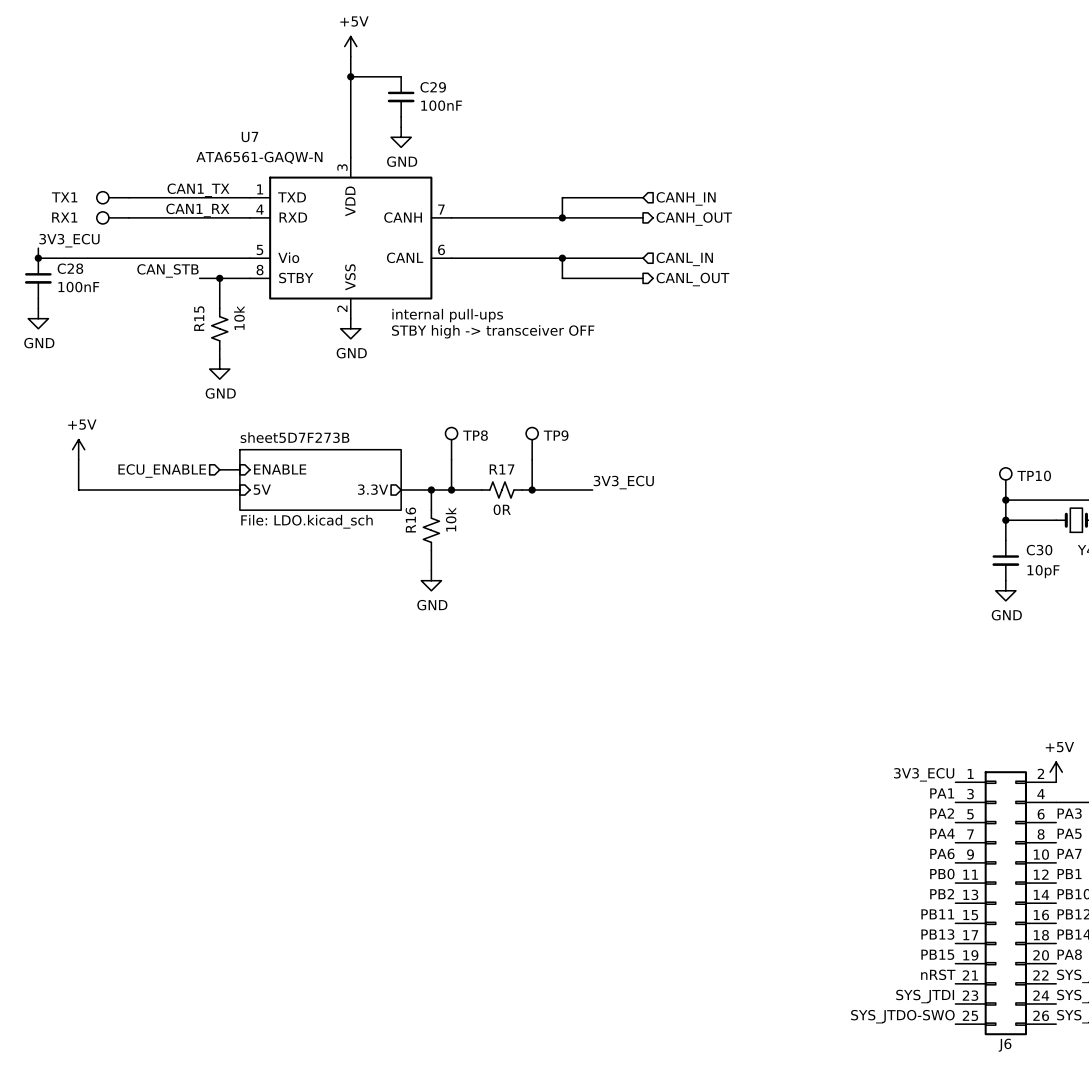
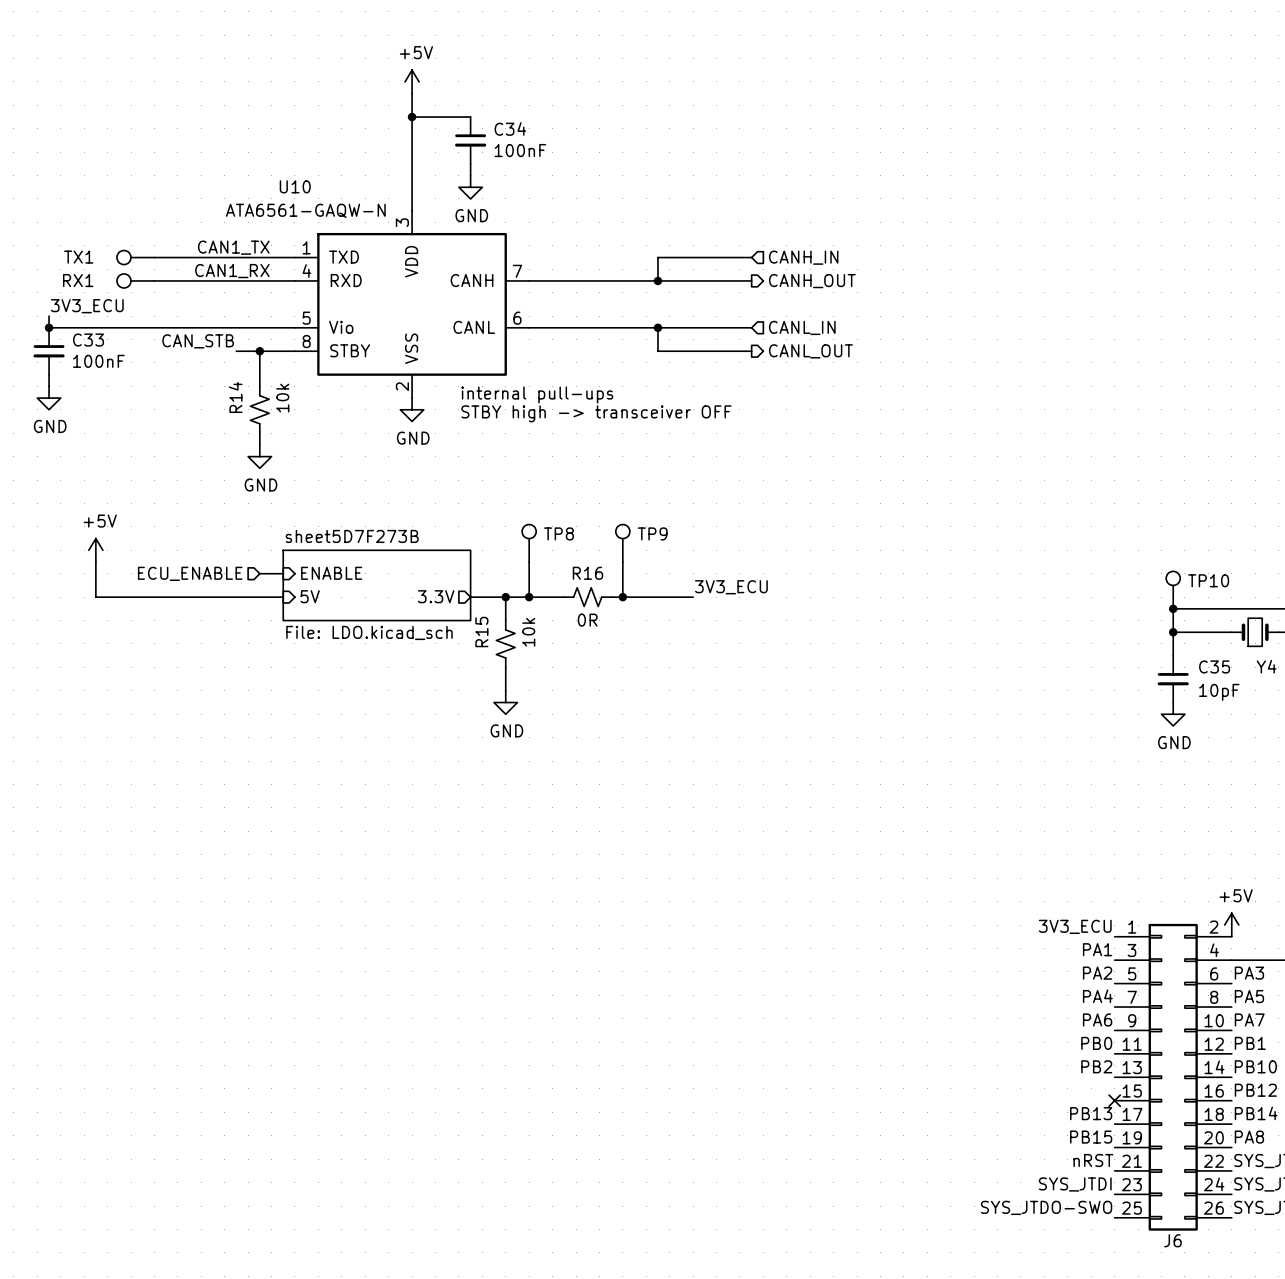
C29 name: C29 (433, 87) -> C34 (510, 128)
U7 name: U7 (249, 137) -> U10 (295, 186)
C28 name: C28 (70, 268) -> C33 (88, 340)
R15 name: R15 (199, 318) -> R14 (235, 397)
R17 name: R17 (502, 469) -> R16 (587, 573)
R16 name: R16 (410, 520) -> R15 (481, 632)
C30 name: C30 (1039, 550) -> C35 (1214, 666)
label: PB11 (937, 914) -> none
no-connect mark: none -> (1114, 1100)

